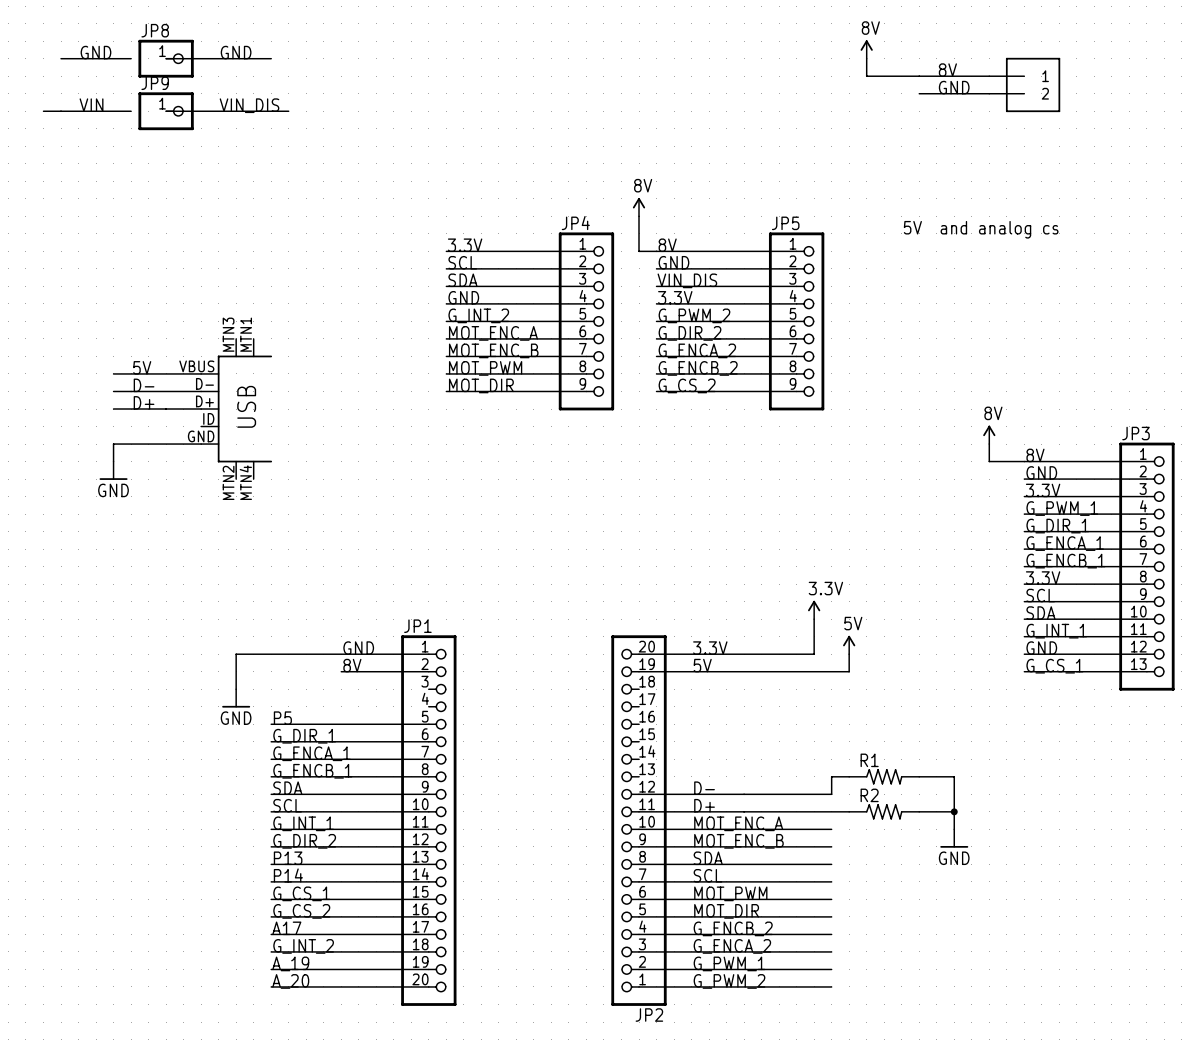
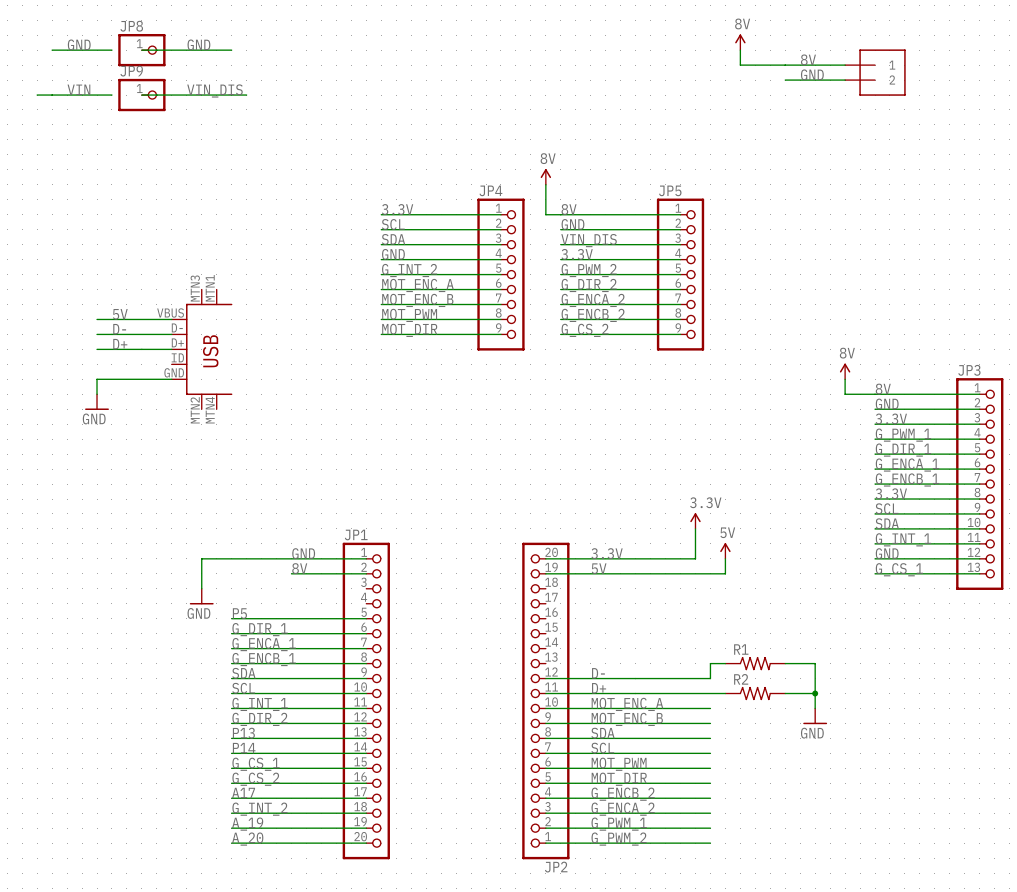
text: 5V and analog cs (981, 229) -> none

